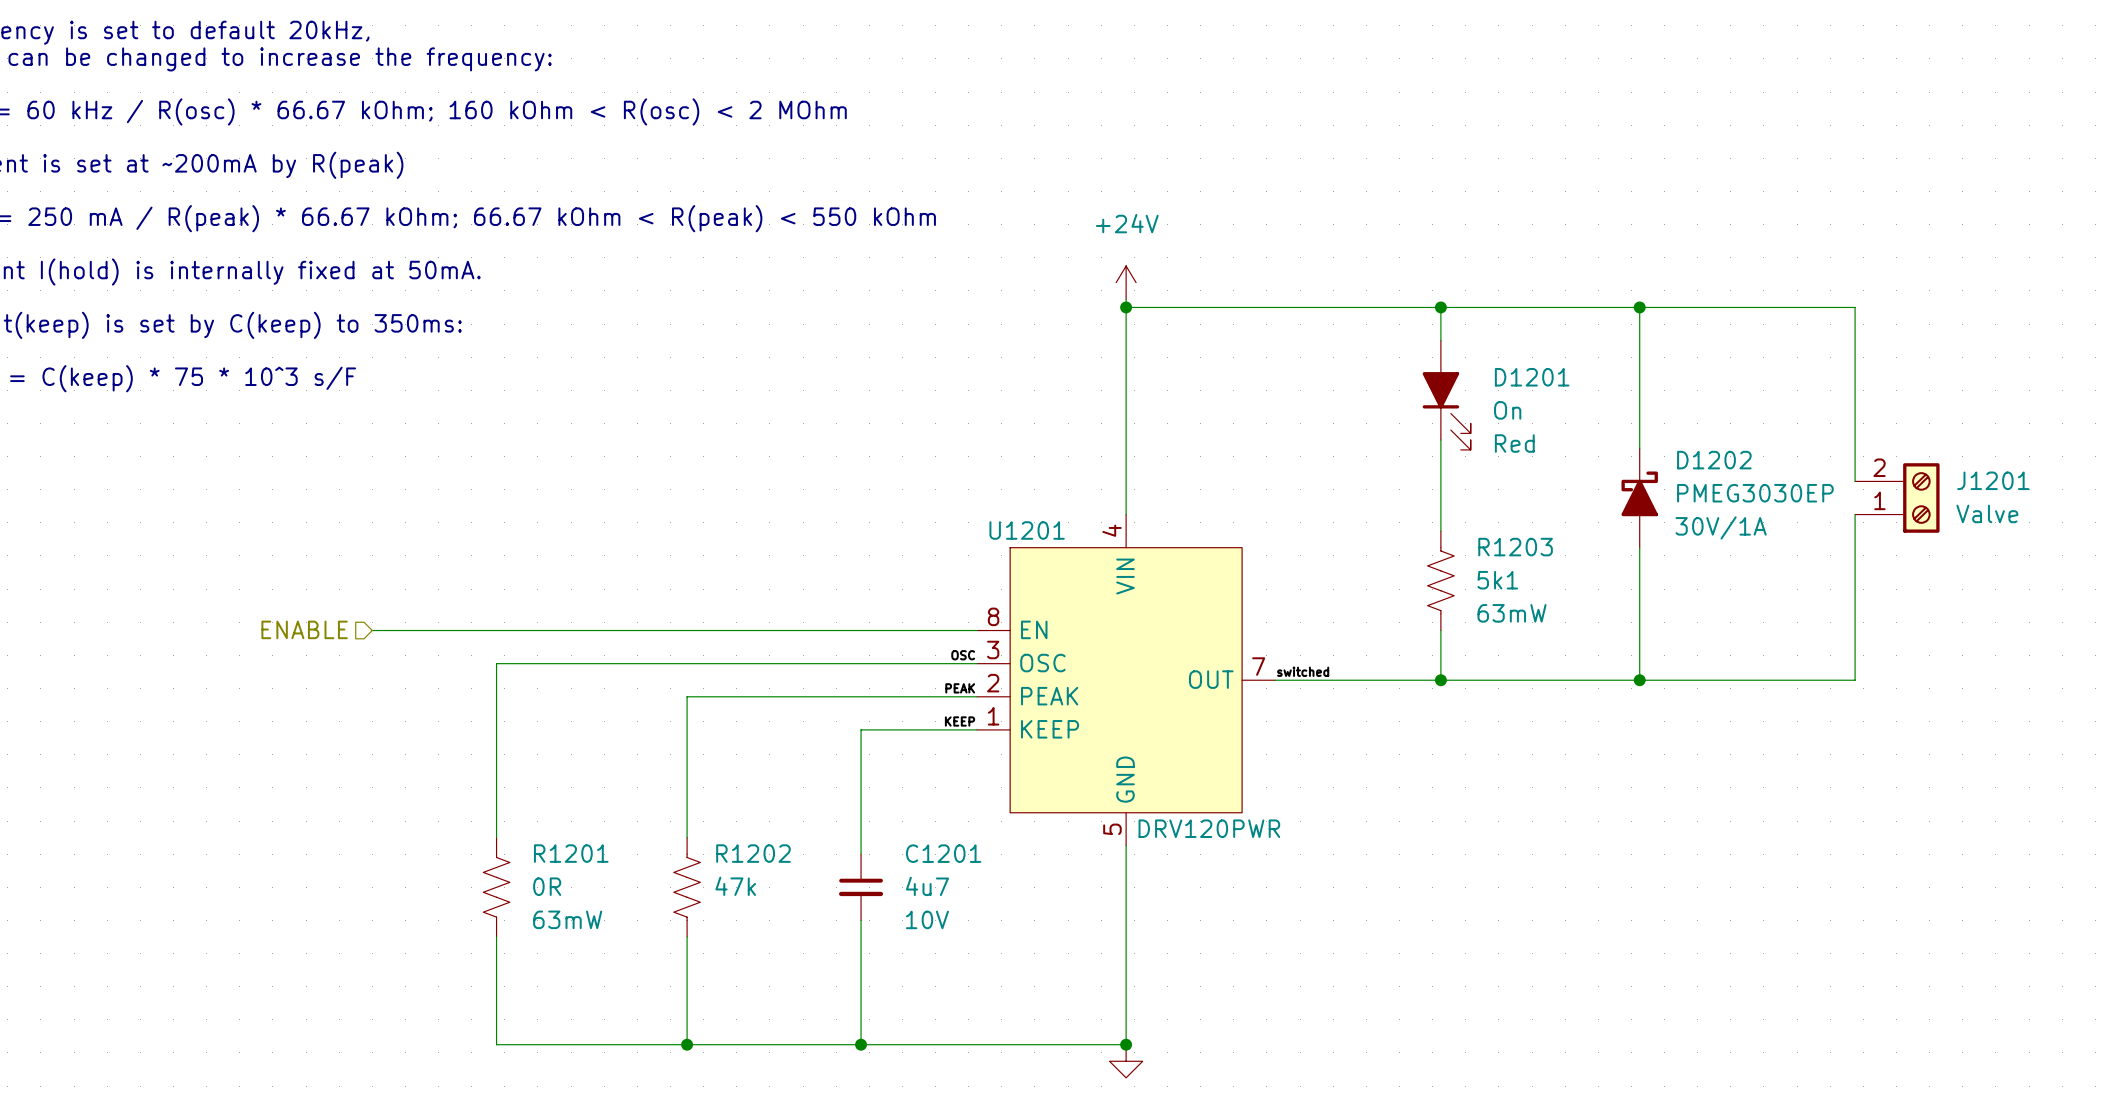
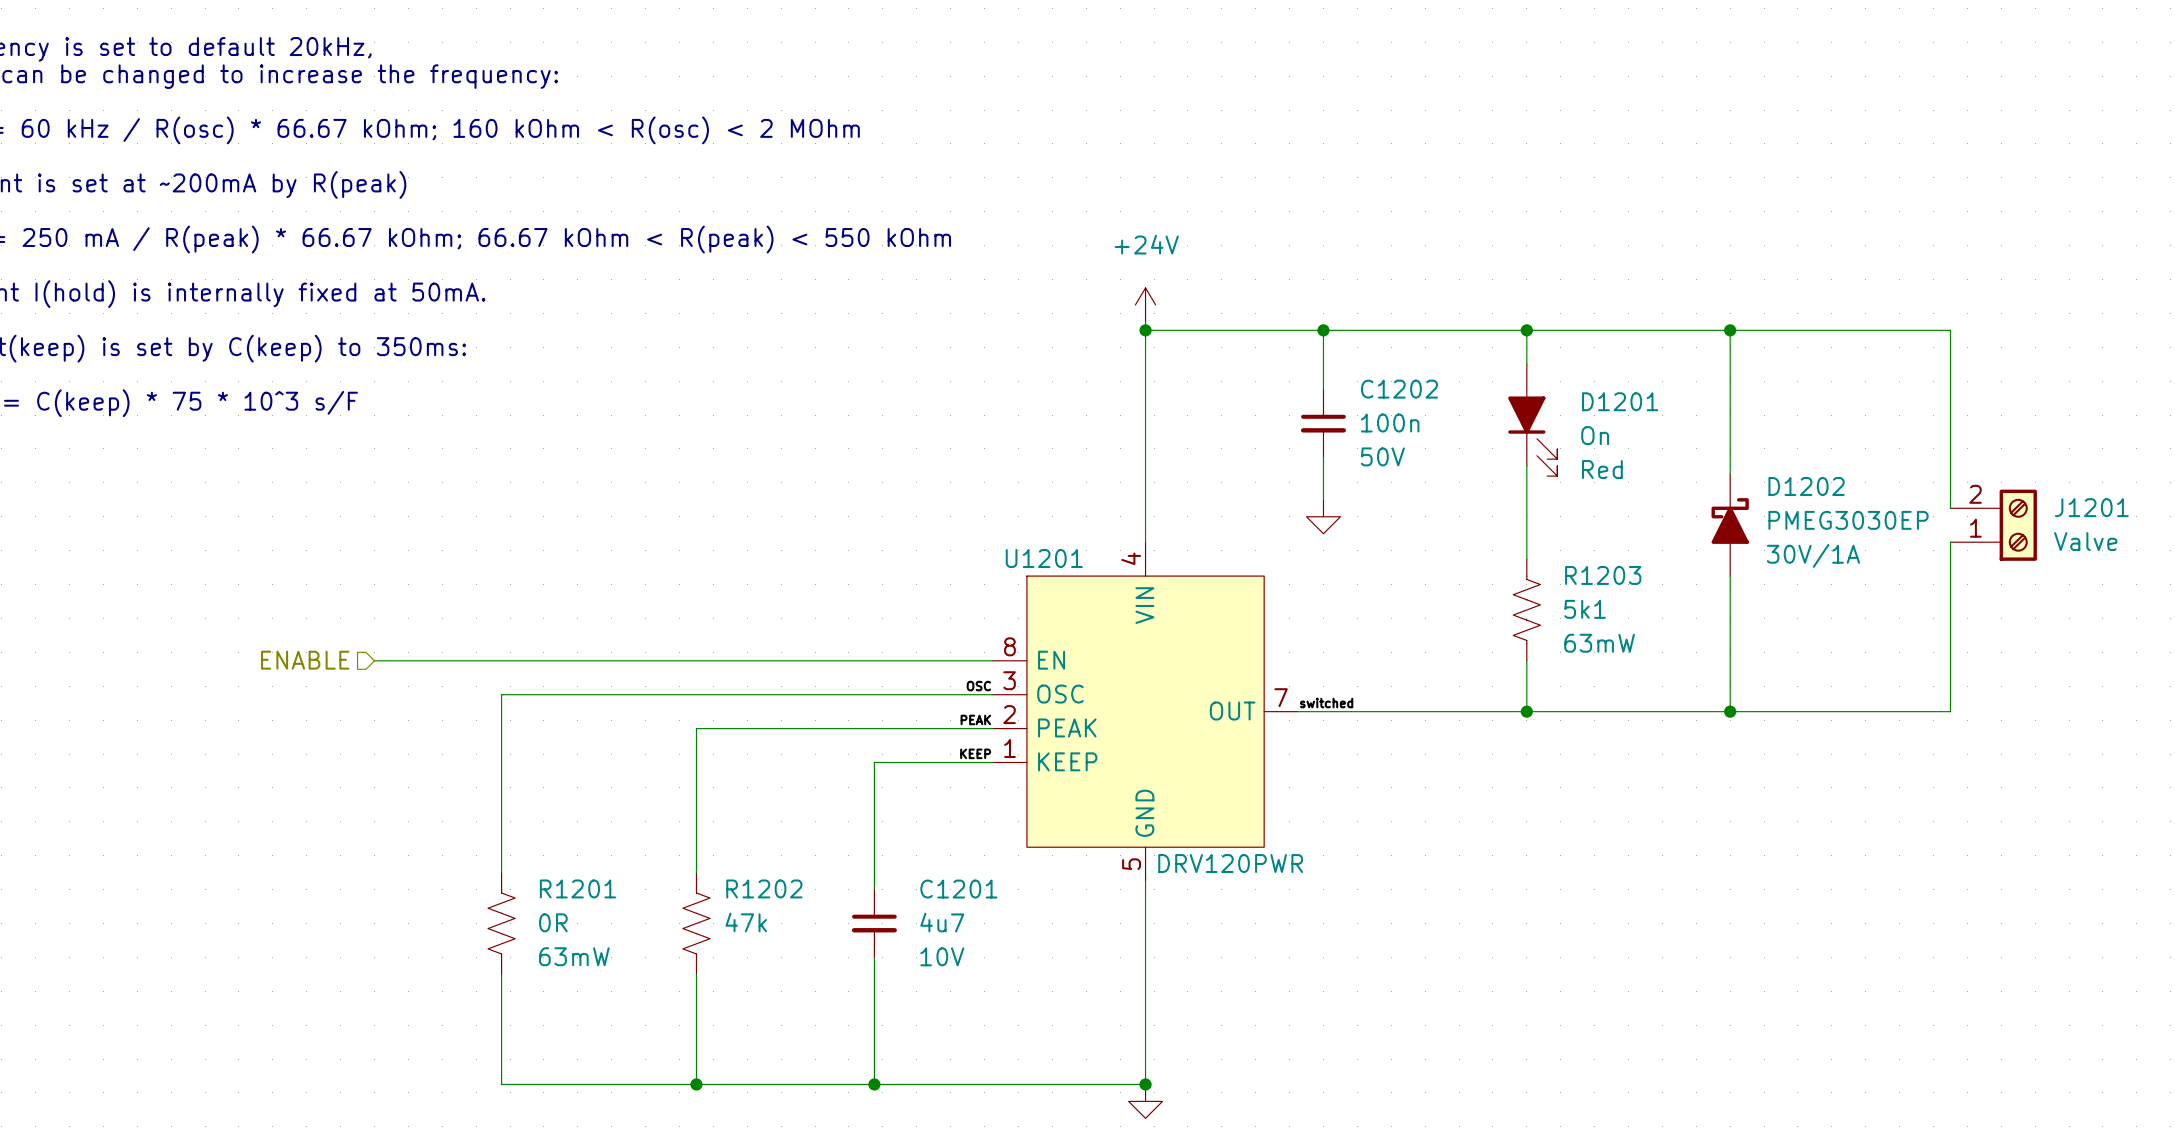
wire: none -> (1323, 330) (1323, 389)
junction: none -> (1323, 330)
wire: (1440, 307) (1440, 340) -> (1526, 330) (1526, 364)
junction position: (1440, 307) -> (1526, 330)
wire: (1639, 307) (1639, 448) -> (1730, 330) (1730, 474)
junction position: (1639, 307) -> (1730, 330)
wire: (1855, 307) (1855, 481) -> (1891, 330) (1950, 330) (1950, 508)
D1201 position: (1446, 395) -> (1532, 420)
C1202: none -> 100n (1323, 423)
wire: none -> (1323, 457) (1323, 499)
wire: (1440, 440) (1440, 531) -> (1526, 465) (1526, 559)
power symbol: none -> (1323, 516)
D1202 position: (1639, 497) -> (1730, 525)
J1201 position: (1897, 497) -> (1993, 525)
wire: (1855, 514) (1855, 680) -> (1950, 542) (1950, 711) (1891, 711)
wire: (1639, 547) (1639, 680) -> (1730, 576) (1730, 711)
R1203 position: (1440, 580) -> (1526, 609)
wire: (1440, 630) (1440, 680) -> (1526, 660) (1526, 711)
junction position: (1440, 680) -> (1526, 711)
junction position: (1639, 680) -> (1730, 711)

